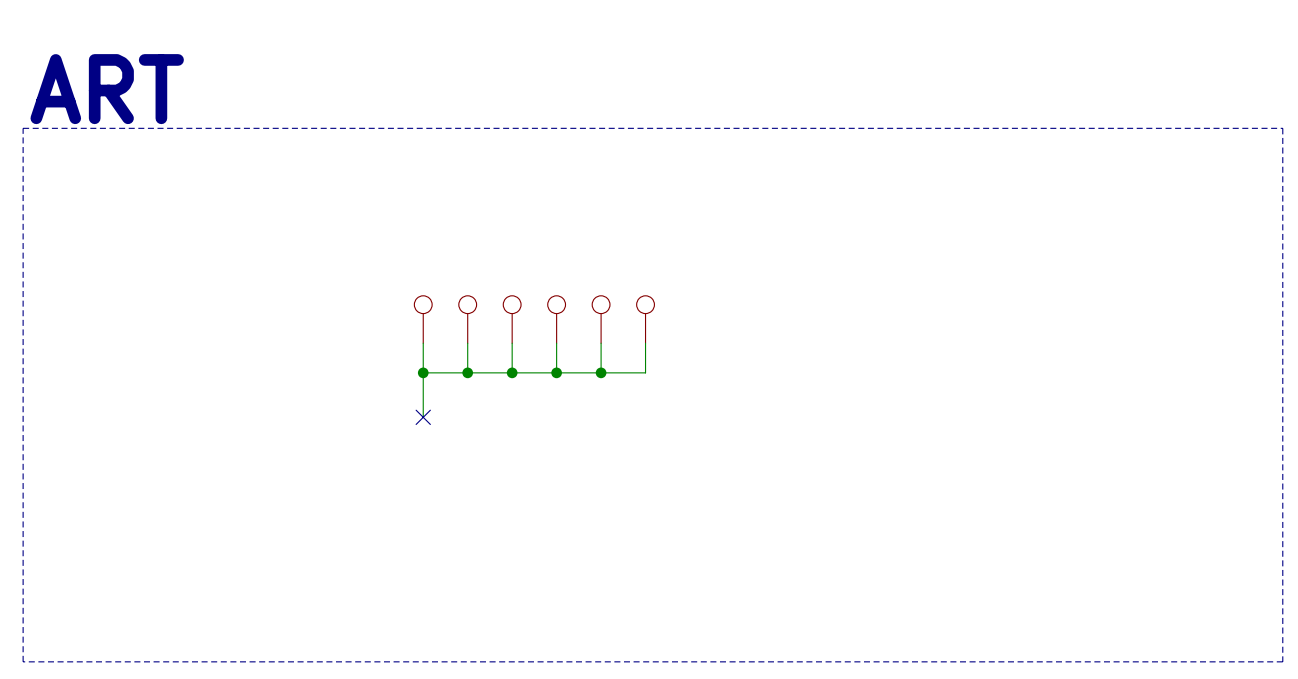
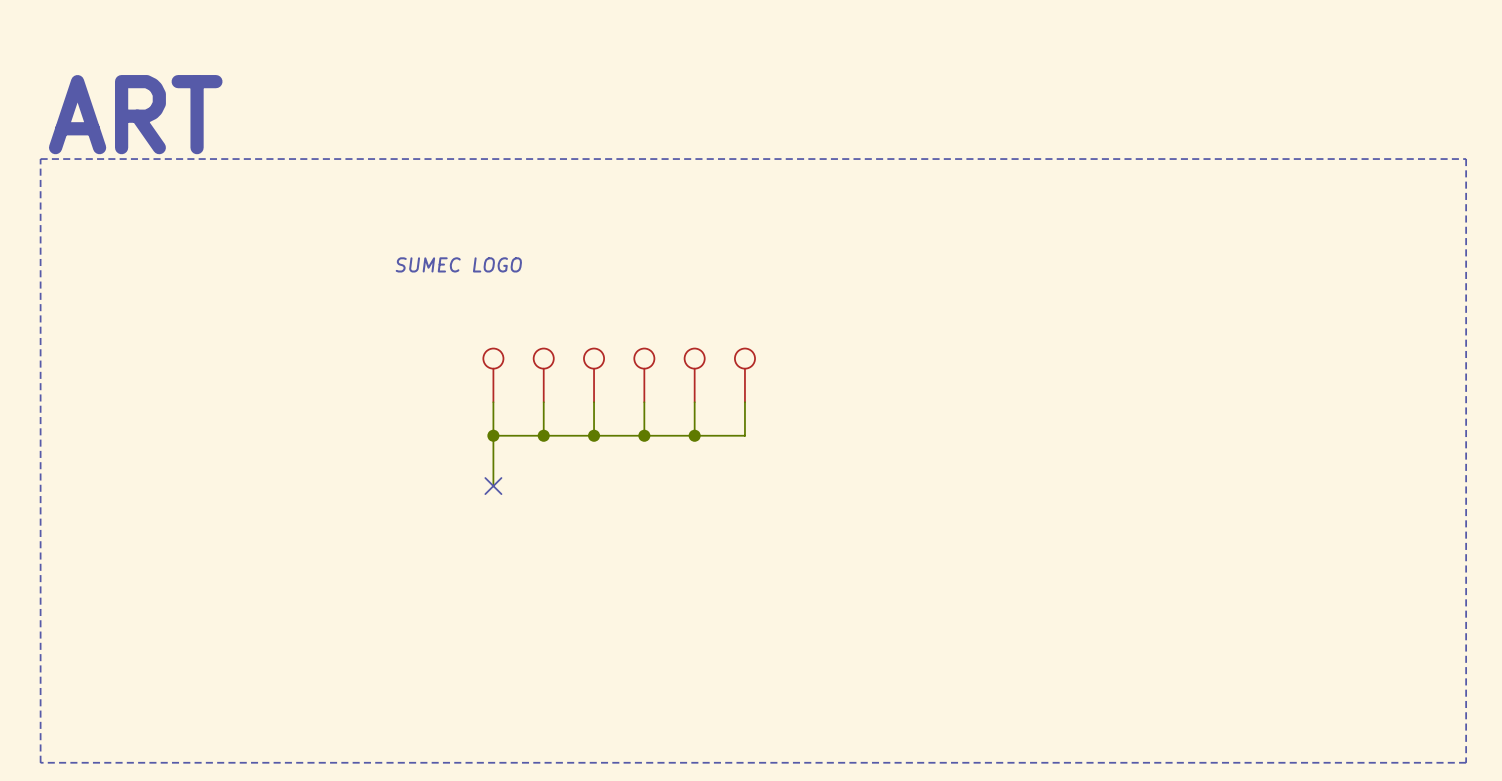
text: none -> SUMEC LOGO (458, 264)

